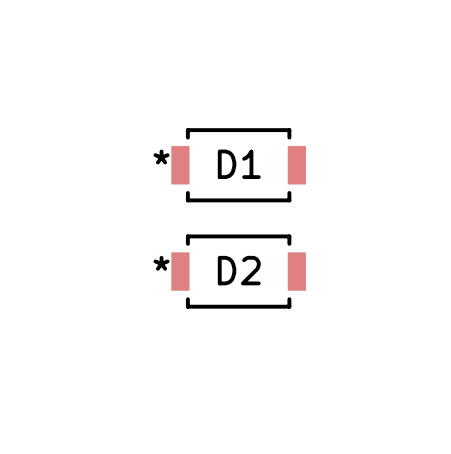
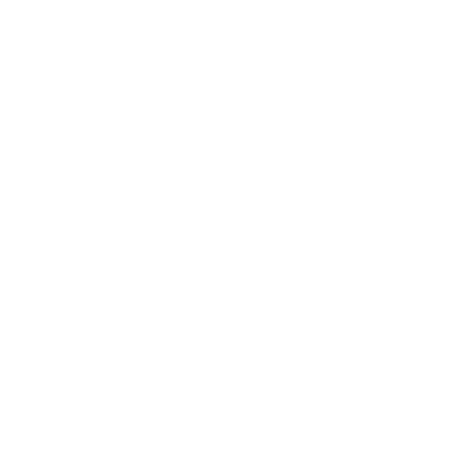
D1: (238, 165) -> none
D2: (238, 271) -> none

